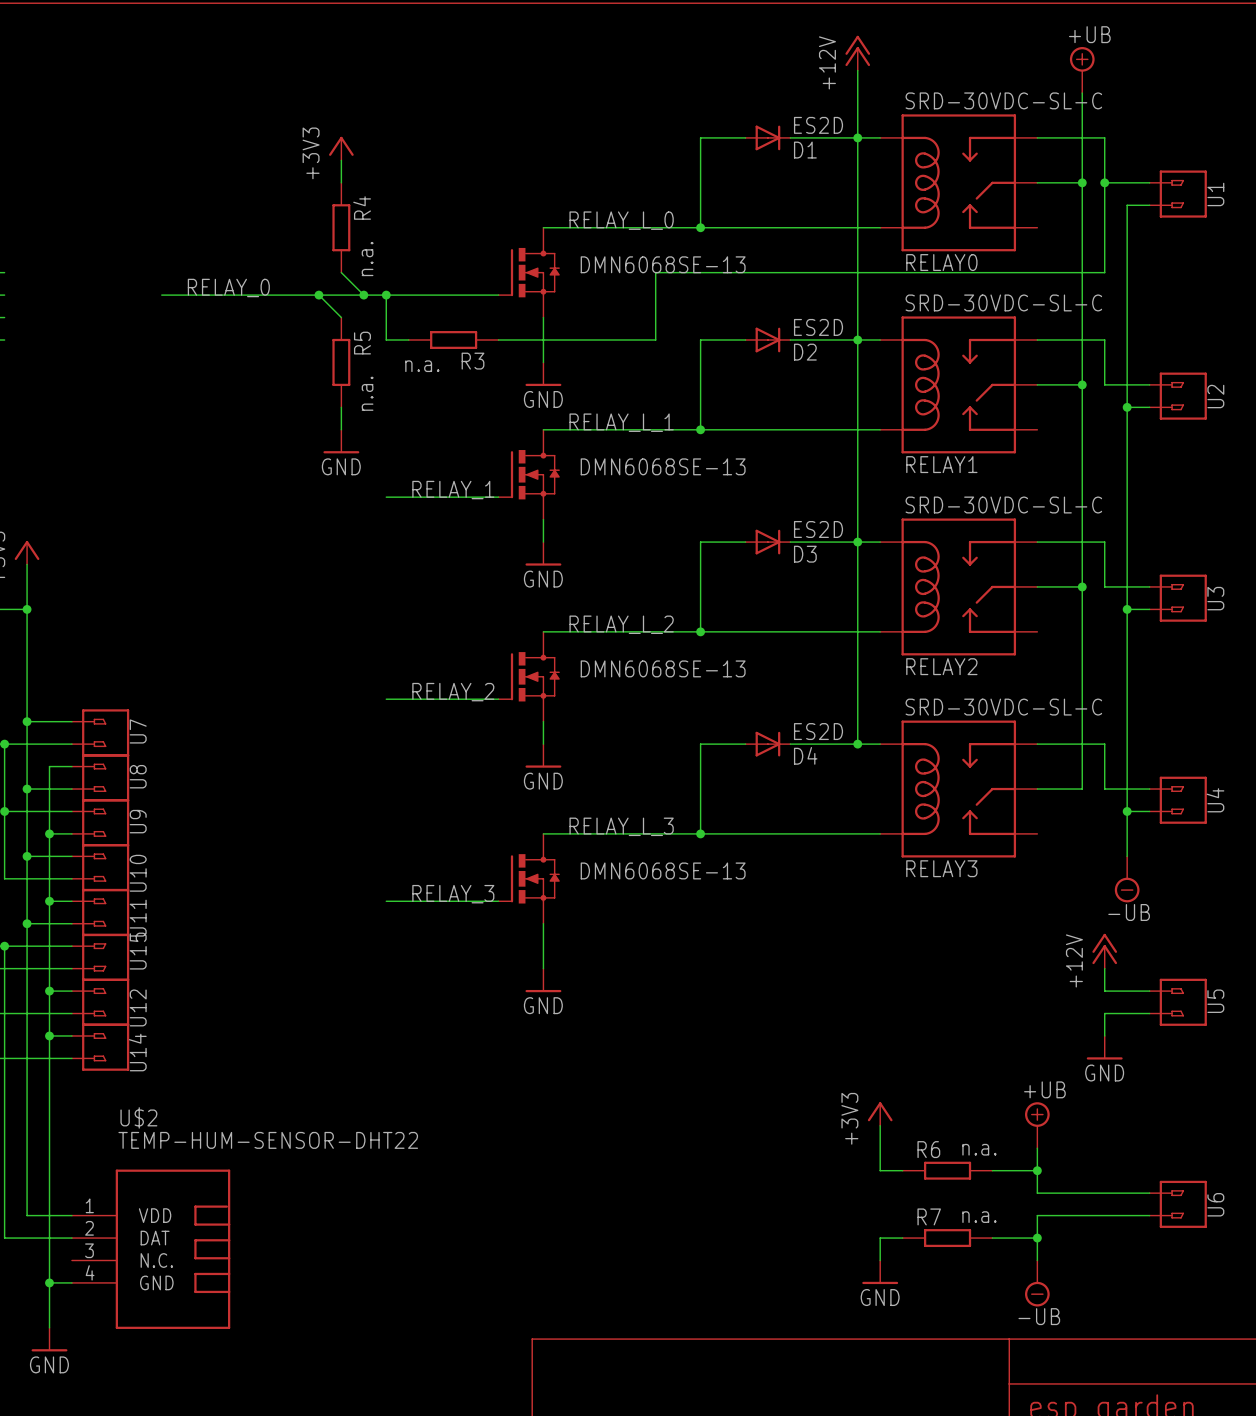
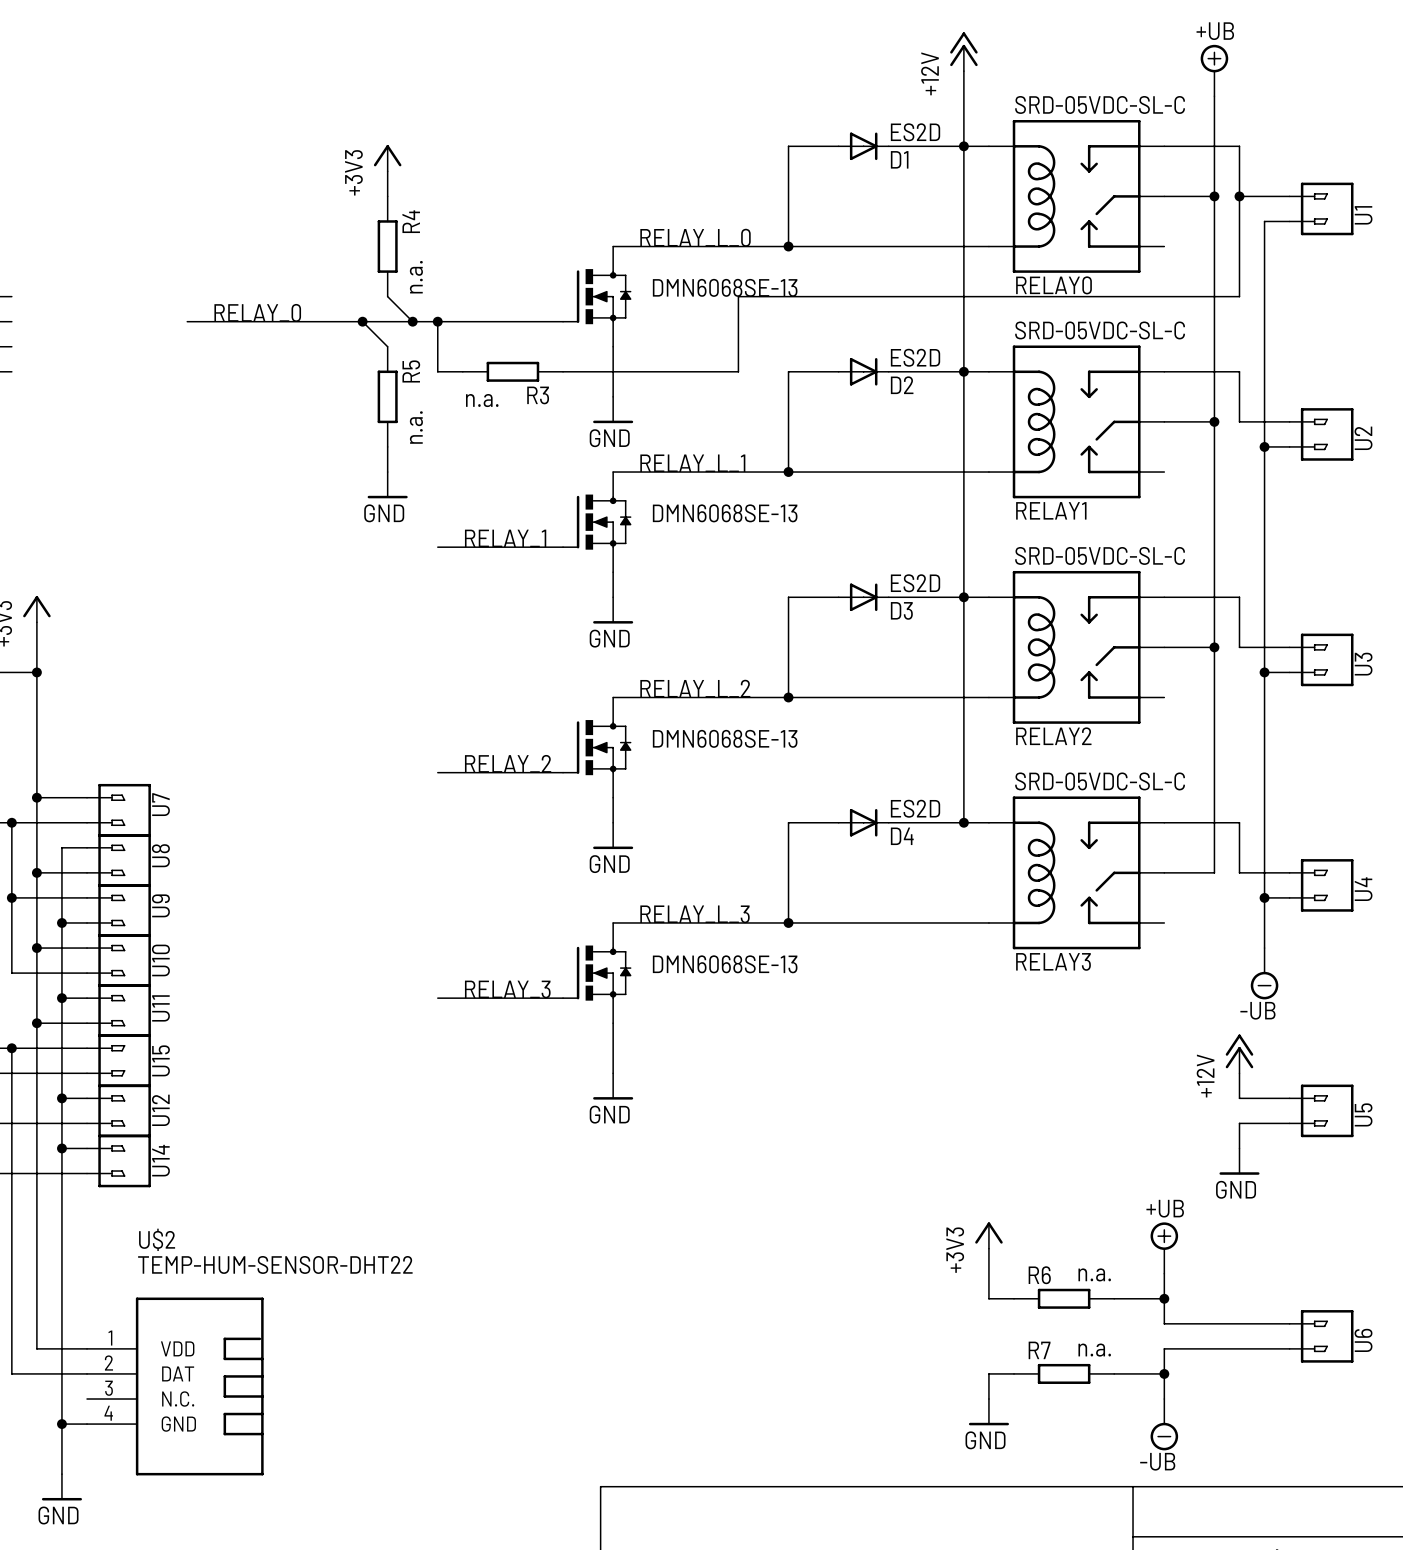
RELAY0 value: SRD-30VDC-SL-C (1003, 100) -> SRD-05VDC-SL-C (1100, 104)
RELAY1 value: SRD-30VDC-SL-C (1003, 302) -> SRD-05VDC-SL-C (1100, 330)
RELAY2 value: SRD-30VDC-SL-C (1003, 505) -> SRD-05VDC-SL-C (1100, 555)
RELAY3 value: SRD-30VDC-SL-C (1003, 707) -> SRD-05VDC-SL-C (1100, 781)
U5 flip: as is (1183, 1002) -> up-down (1327, 1110)

